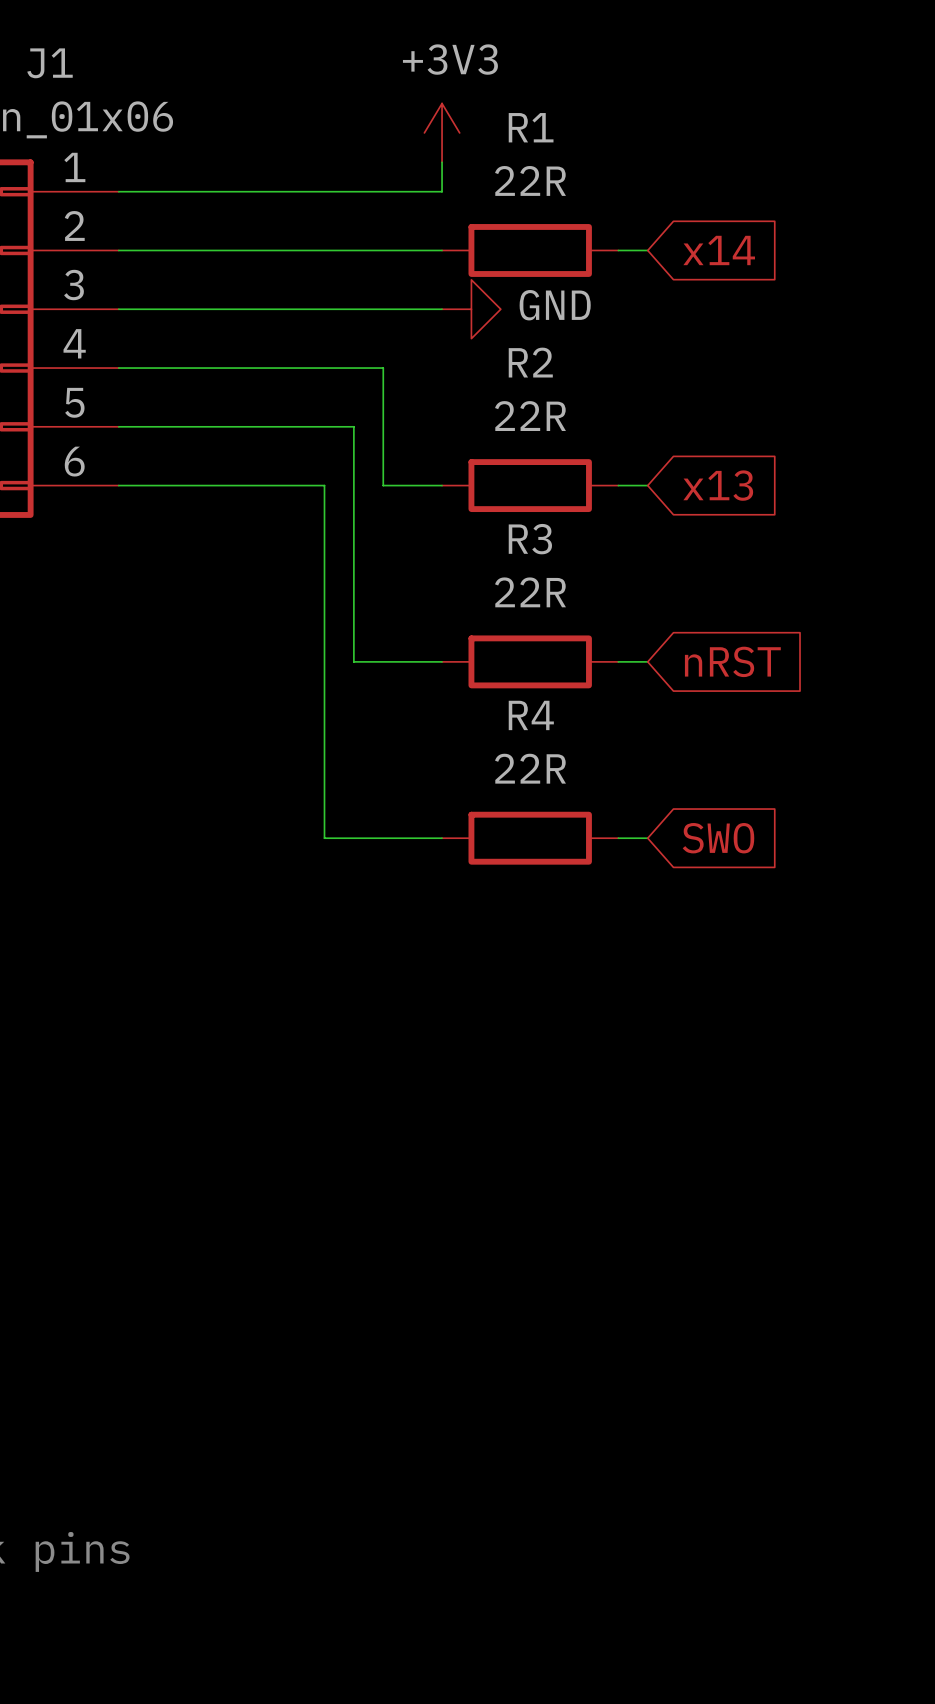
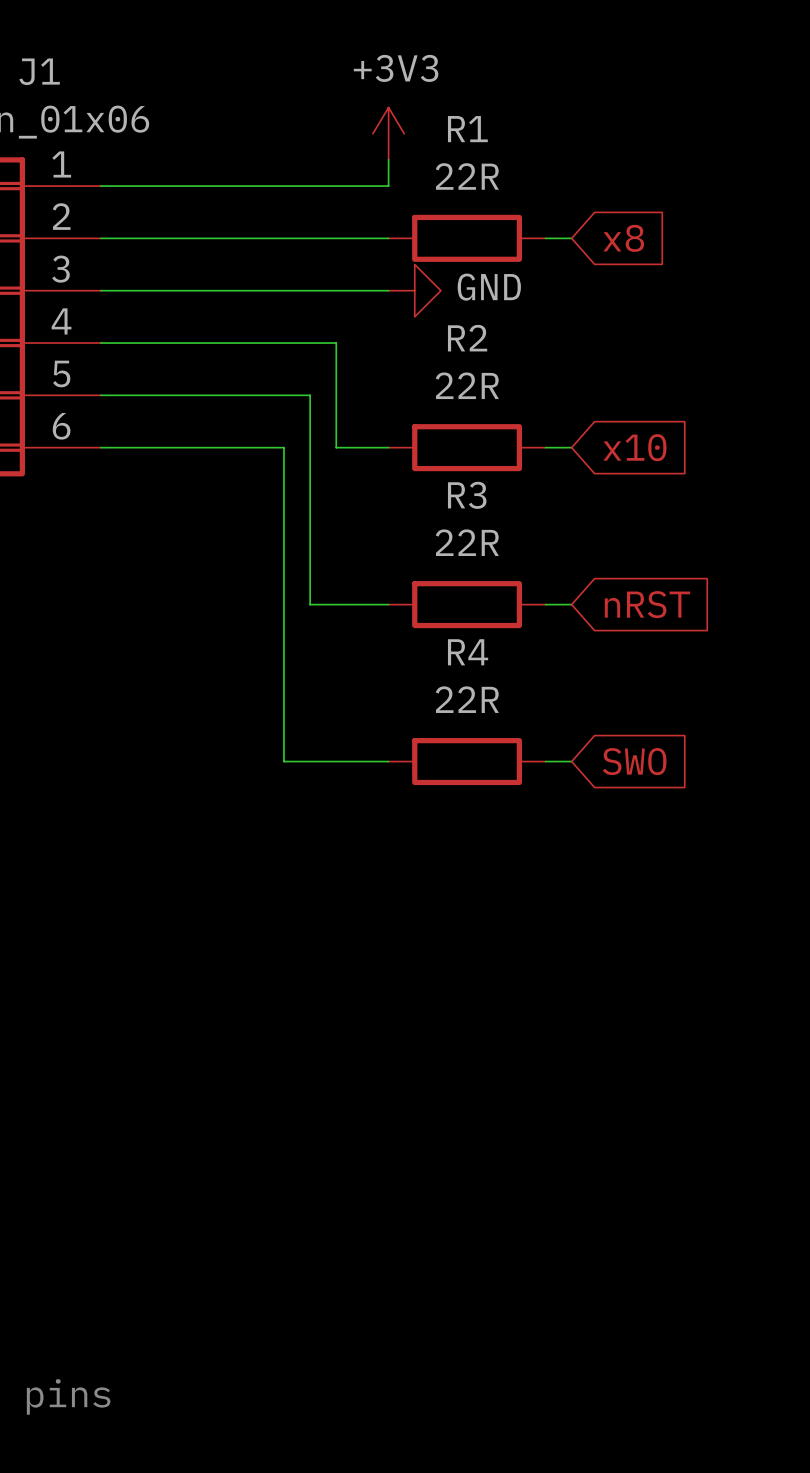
global label: x14 (719, 250) -> x8 (623, 238)
global label: x13 (718, 485) -> x10 (634, 447)

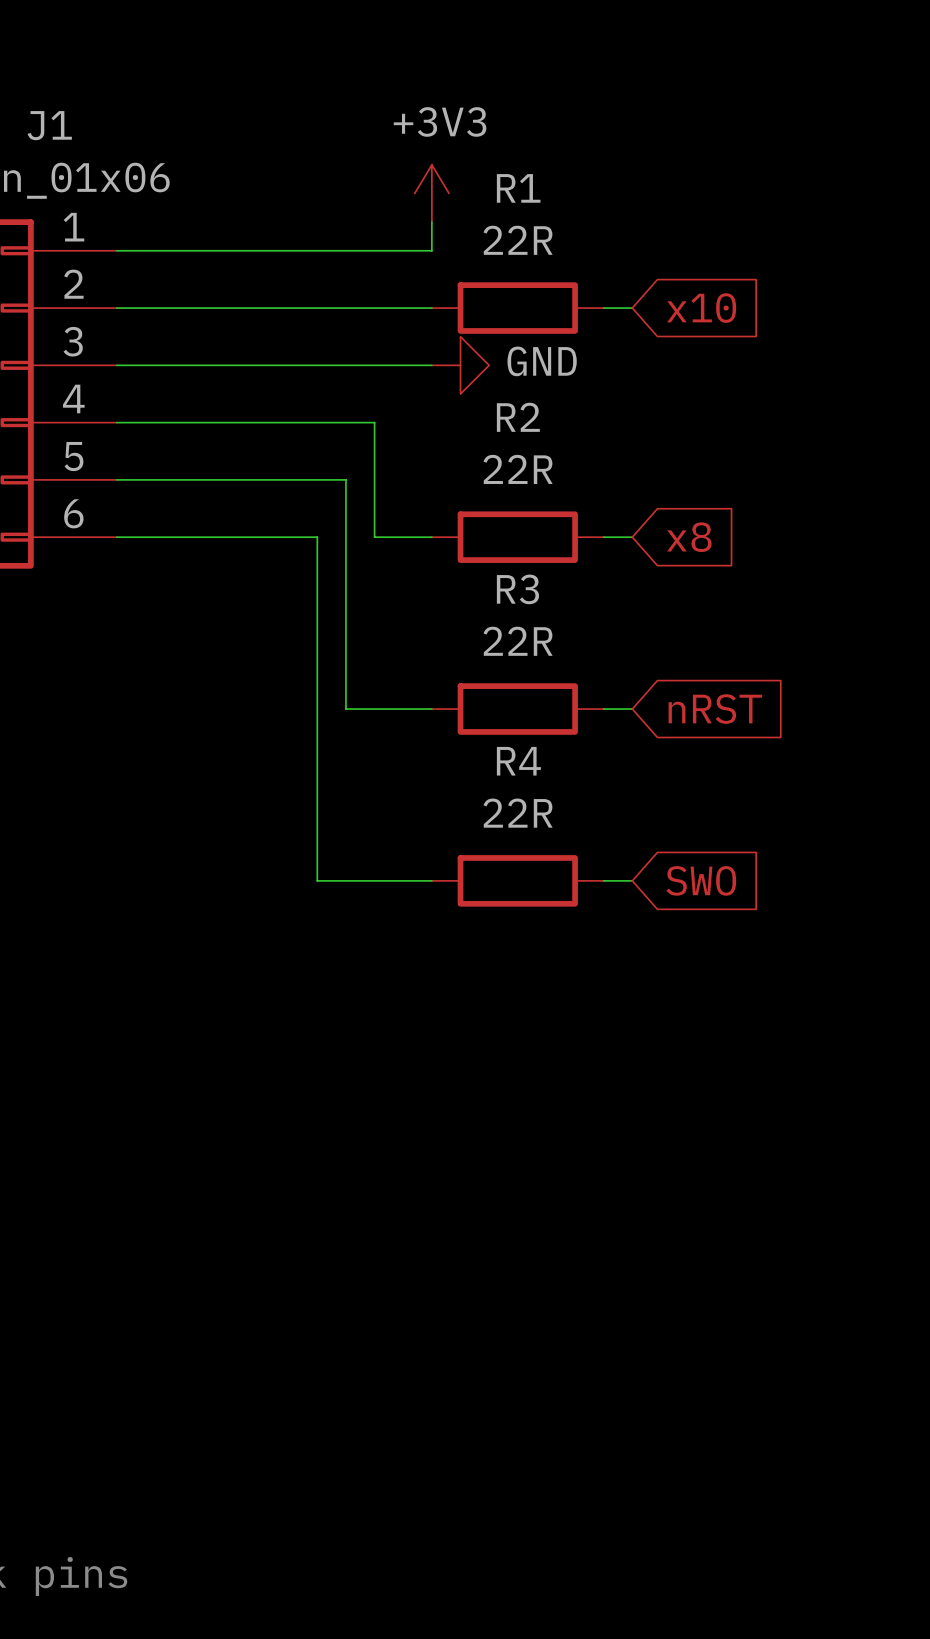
global label: x8 (623, 238) -> x10 (701, 308)
global label: x10 (634, 447) -> x8 (689, 537)

